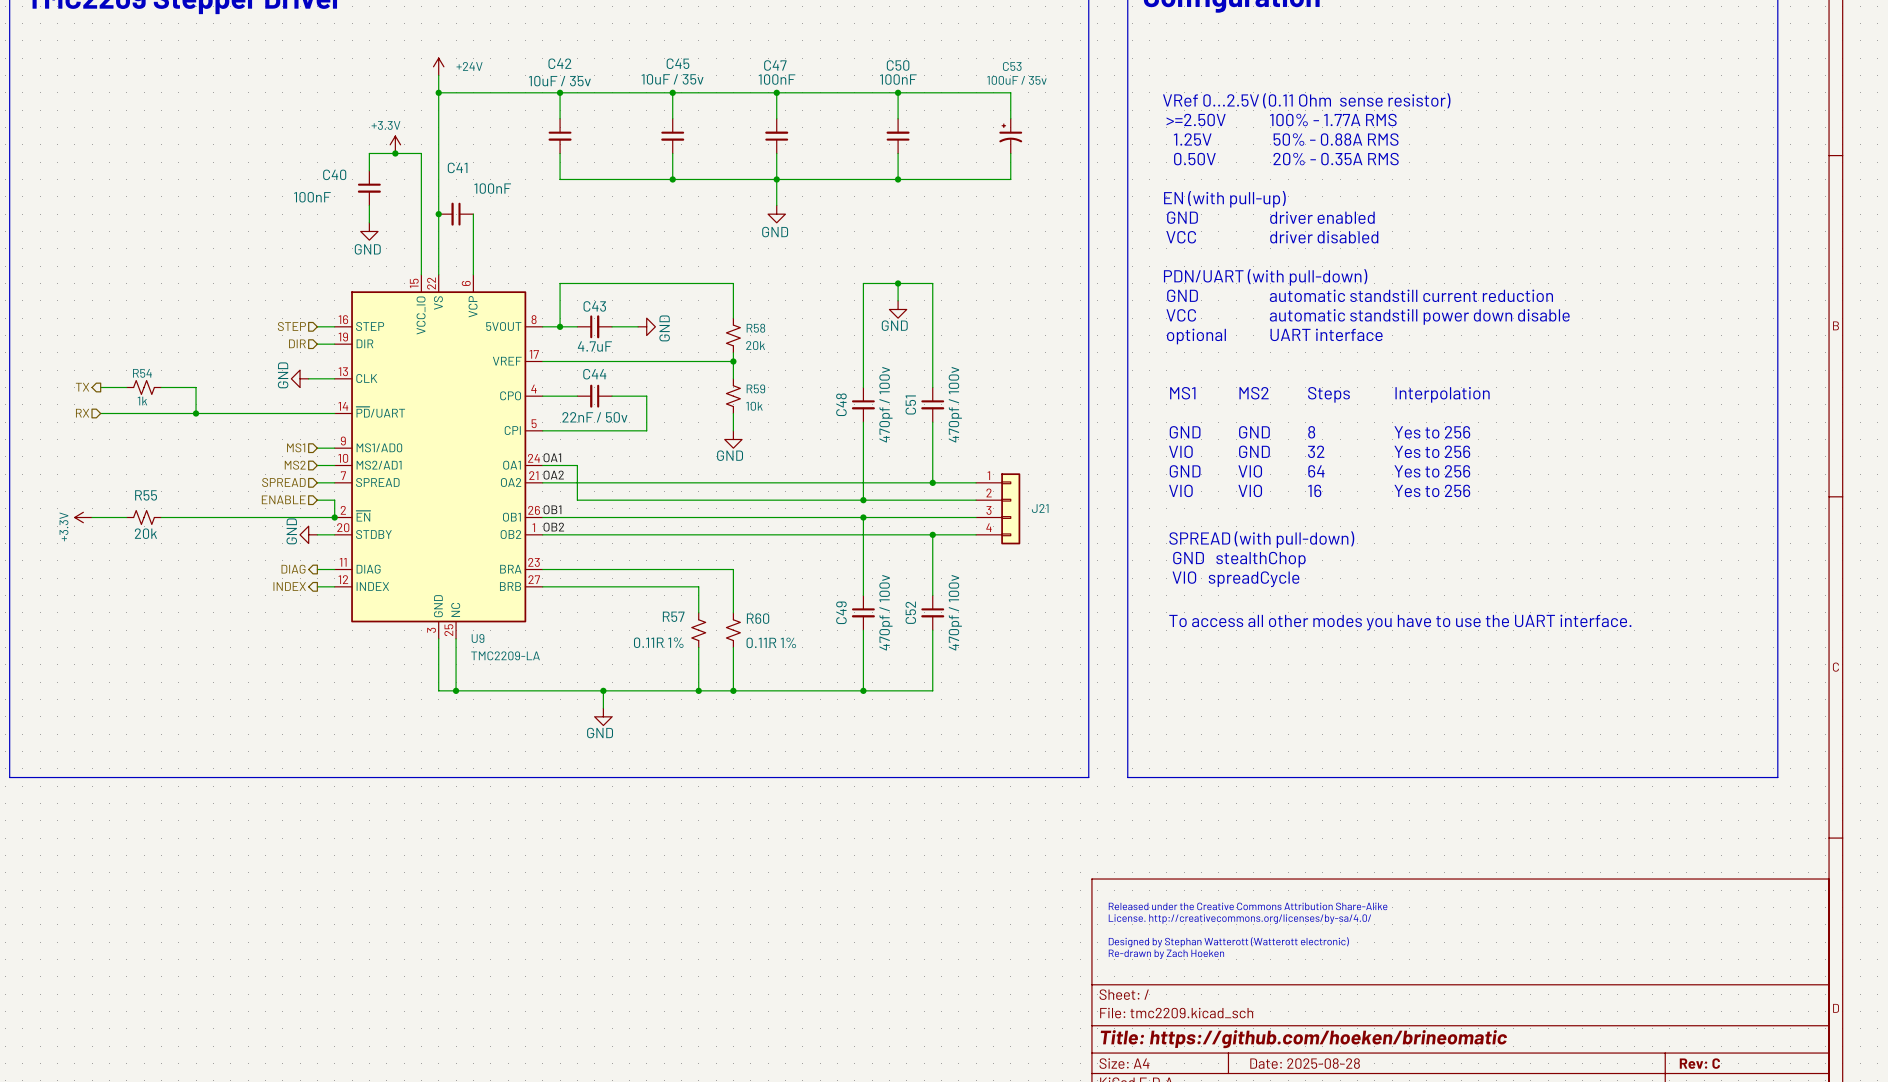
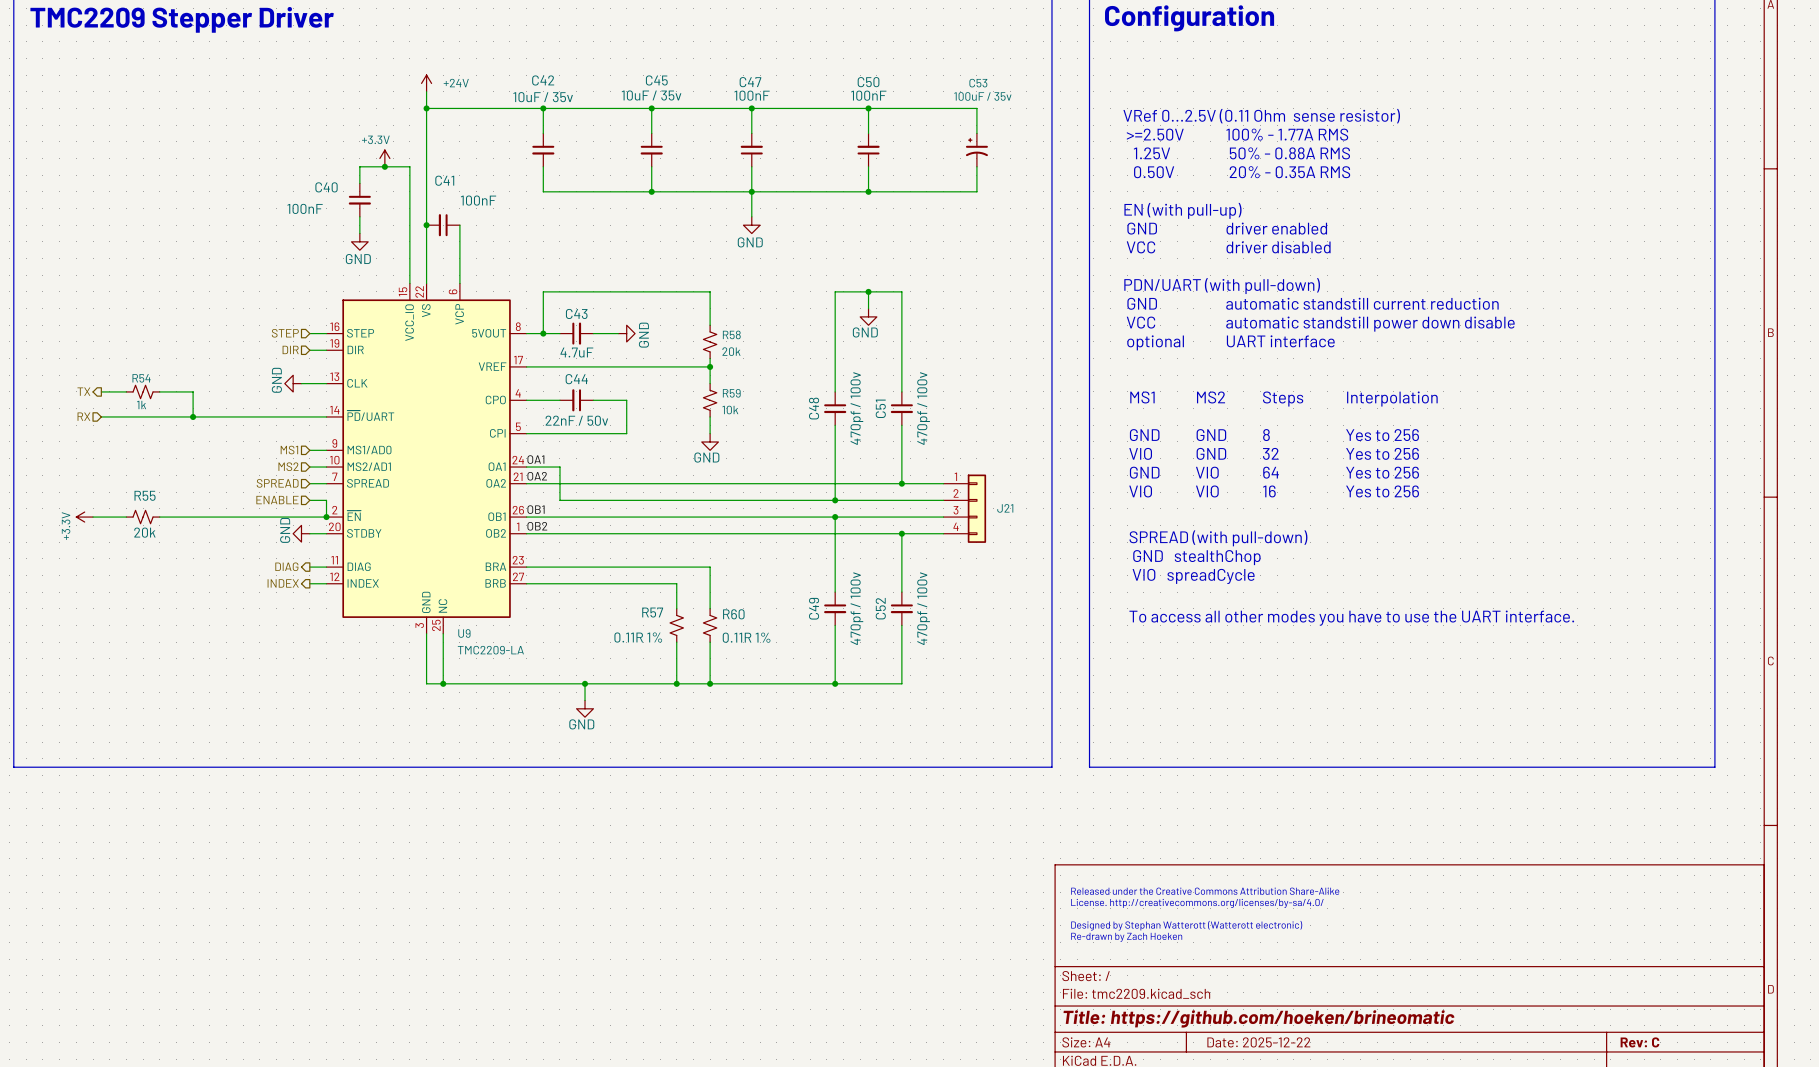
title block: Date: 2025-08-28 (1305, 1063) -> Date: 2025-12-22 (1258, 1042)

